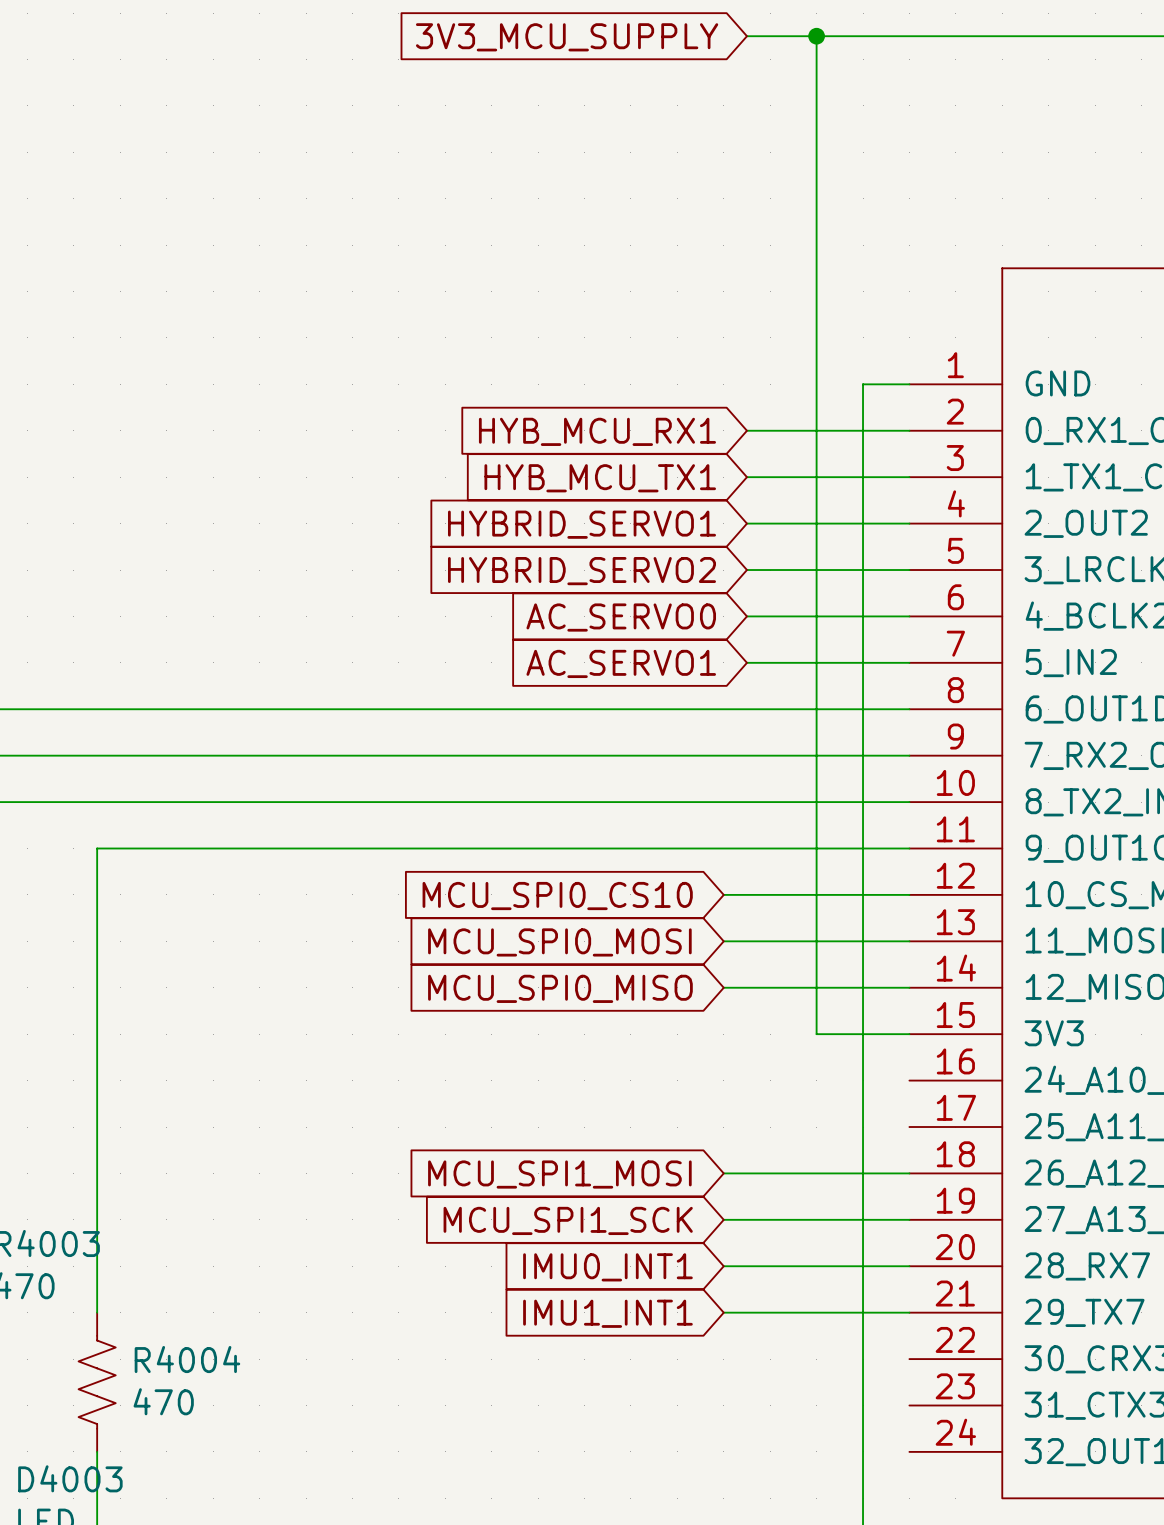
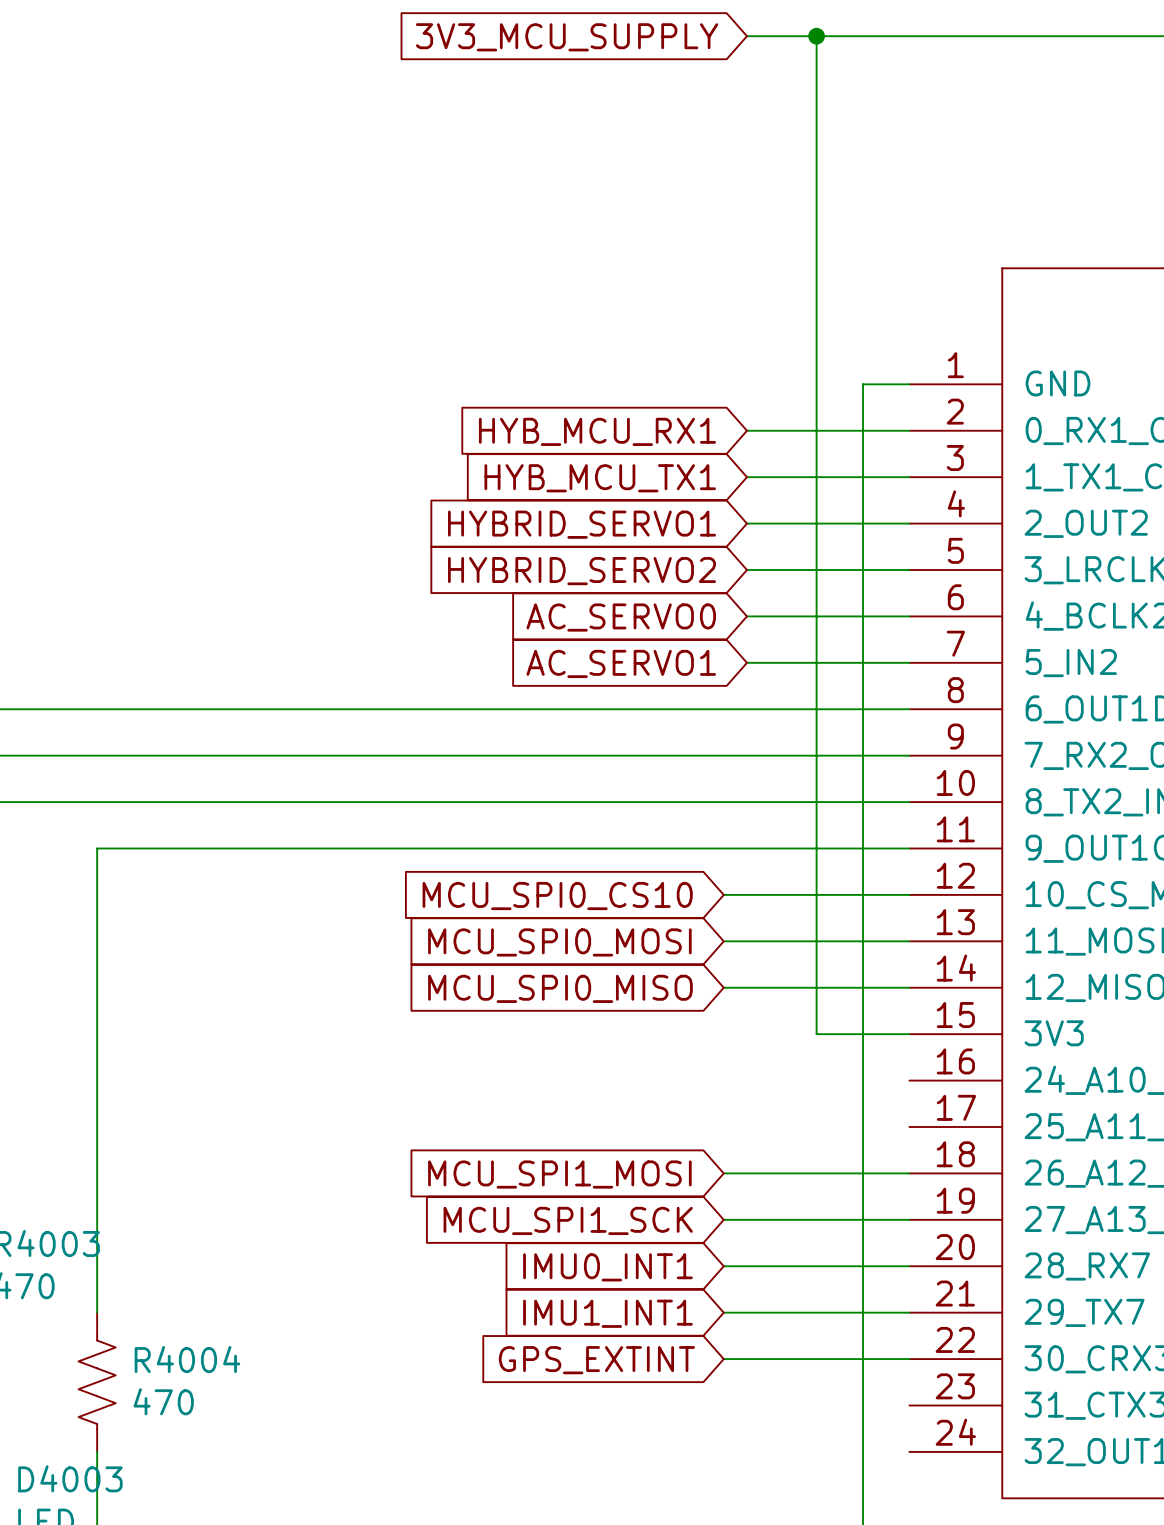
wire: none -> (723, 1359) (909, 1359)
global label: none -> GPS_EXTINT (596, 1360)

